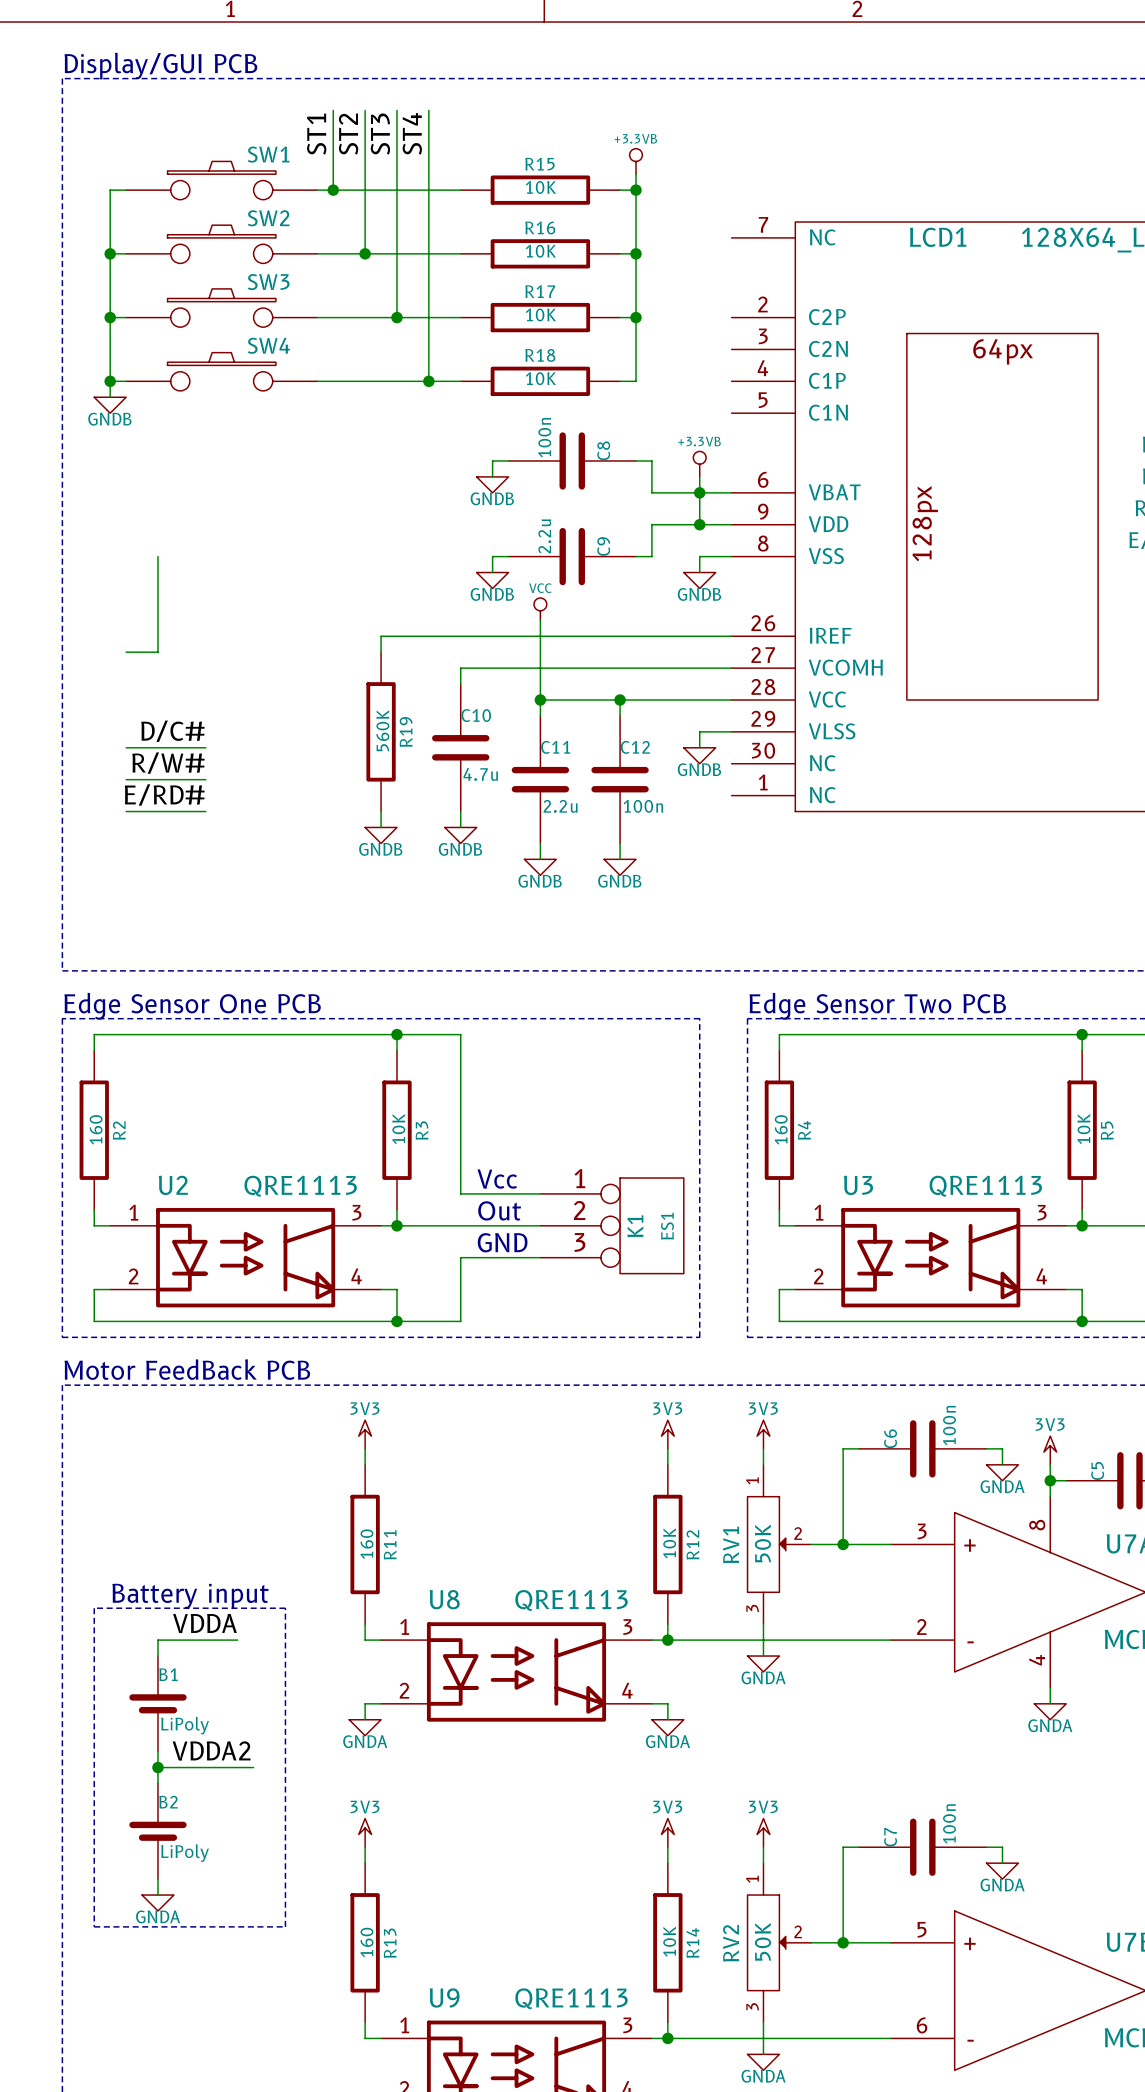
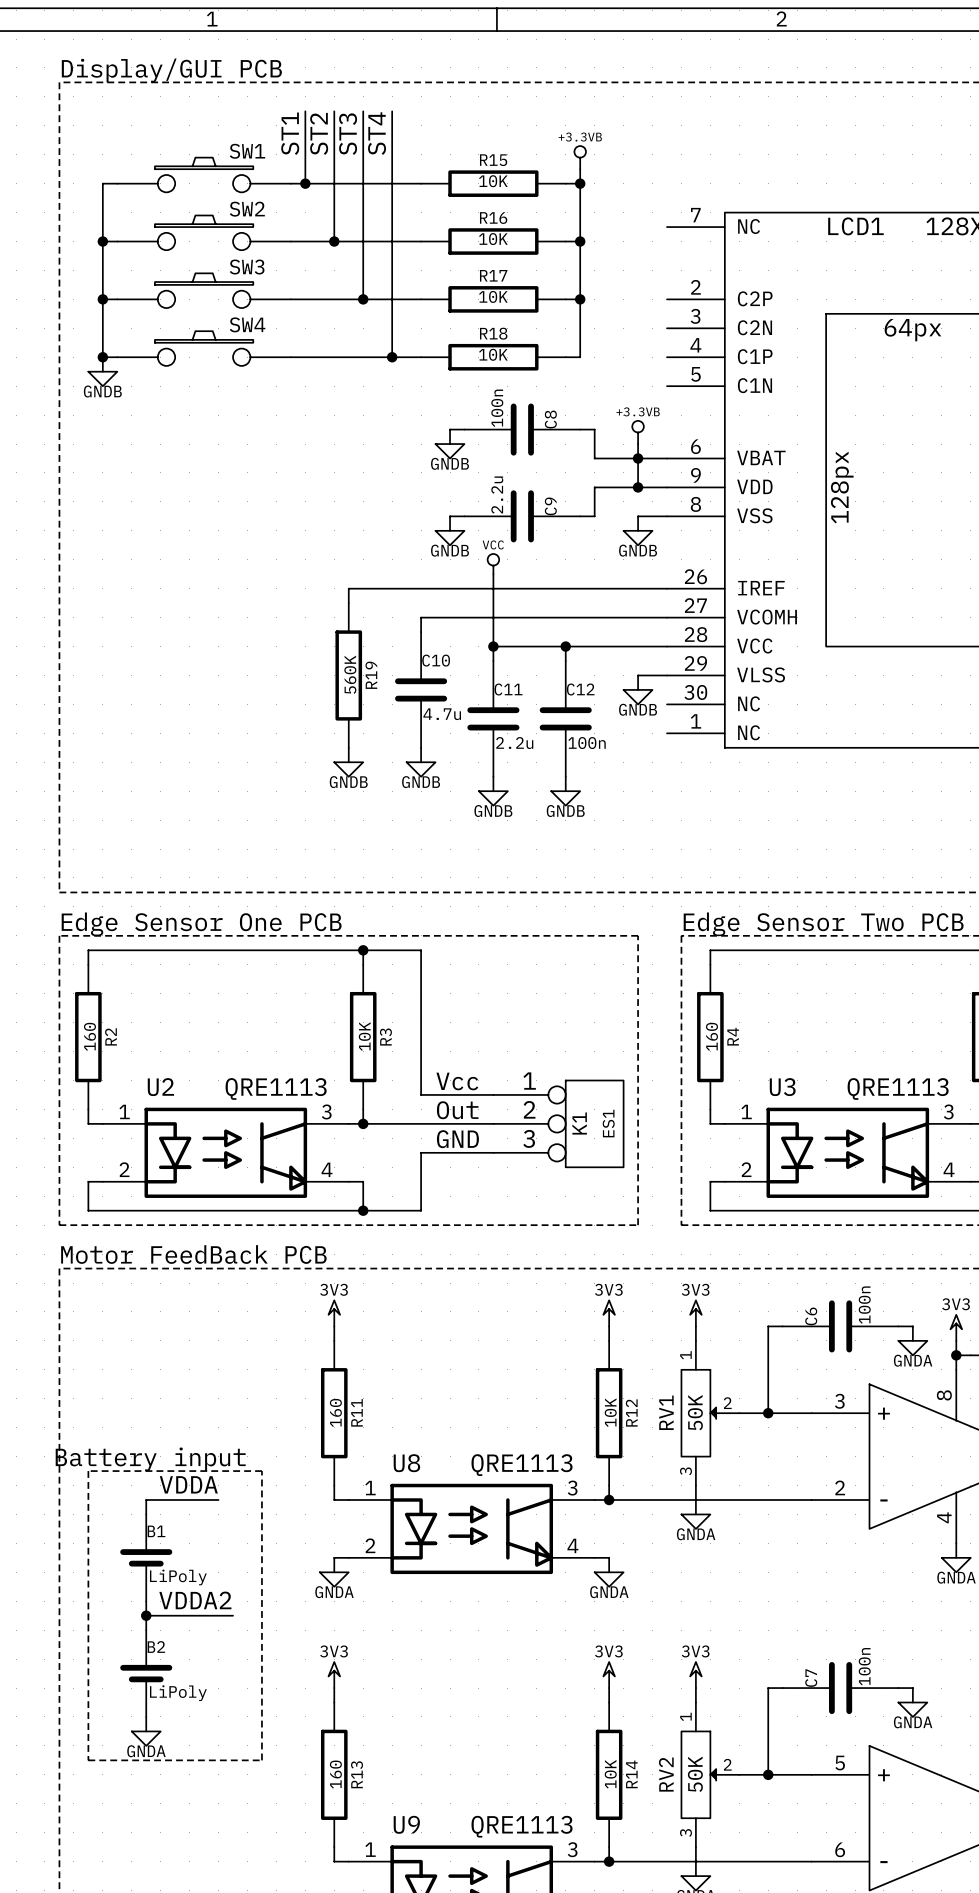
wire: (157, 556) (157, 652) (126, 652) -> none
label: D/C# (172, 731) -> none
wire: (126, 747) (205, 747) -> none
label: R/W# (168, 763) -> none
wire: (126, 779) (205, 779) -> none
label: E/RD# (164, 794) -> none
wire: (126, 811) (205, 811) -> none

